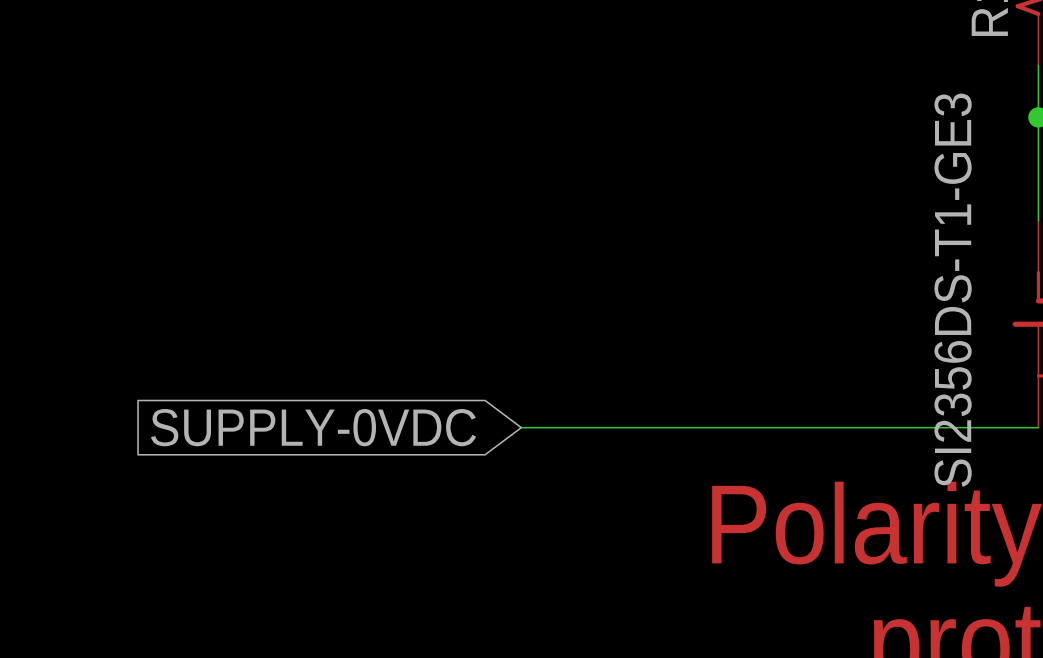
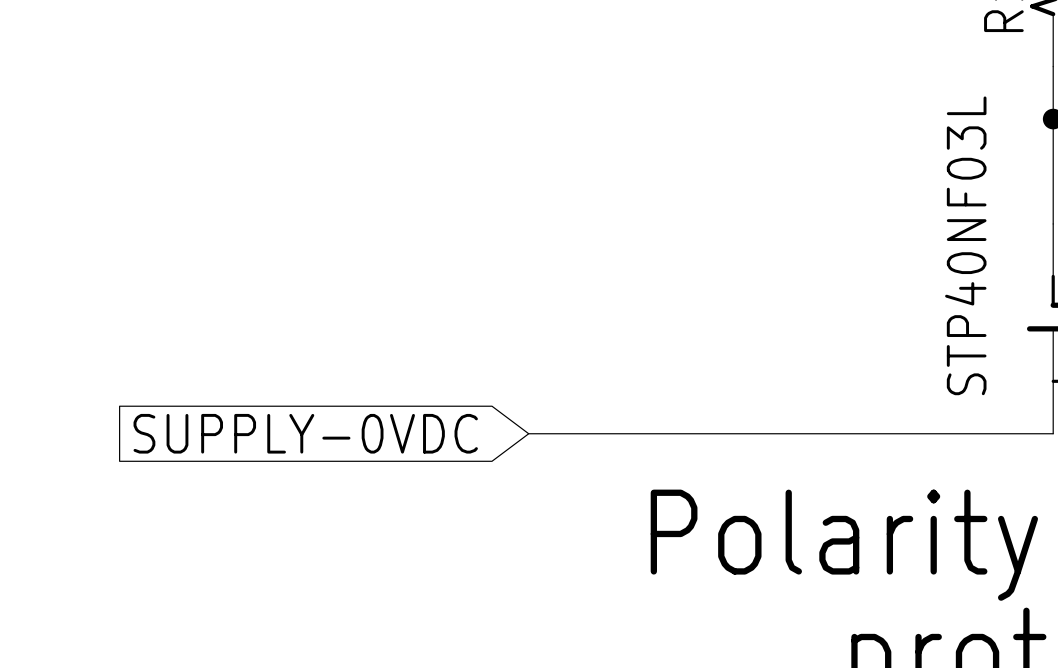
part value: SI2356DS-T1-GE3 (953, 290) -> STP40NF03L (965, 245)

